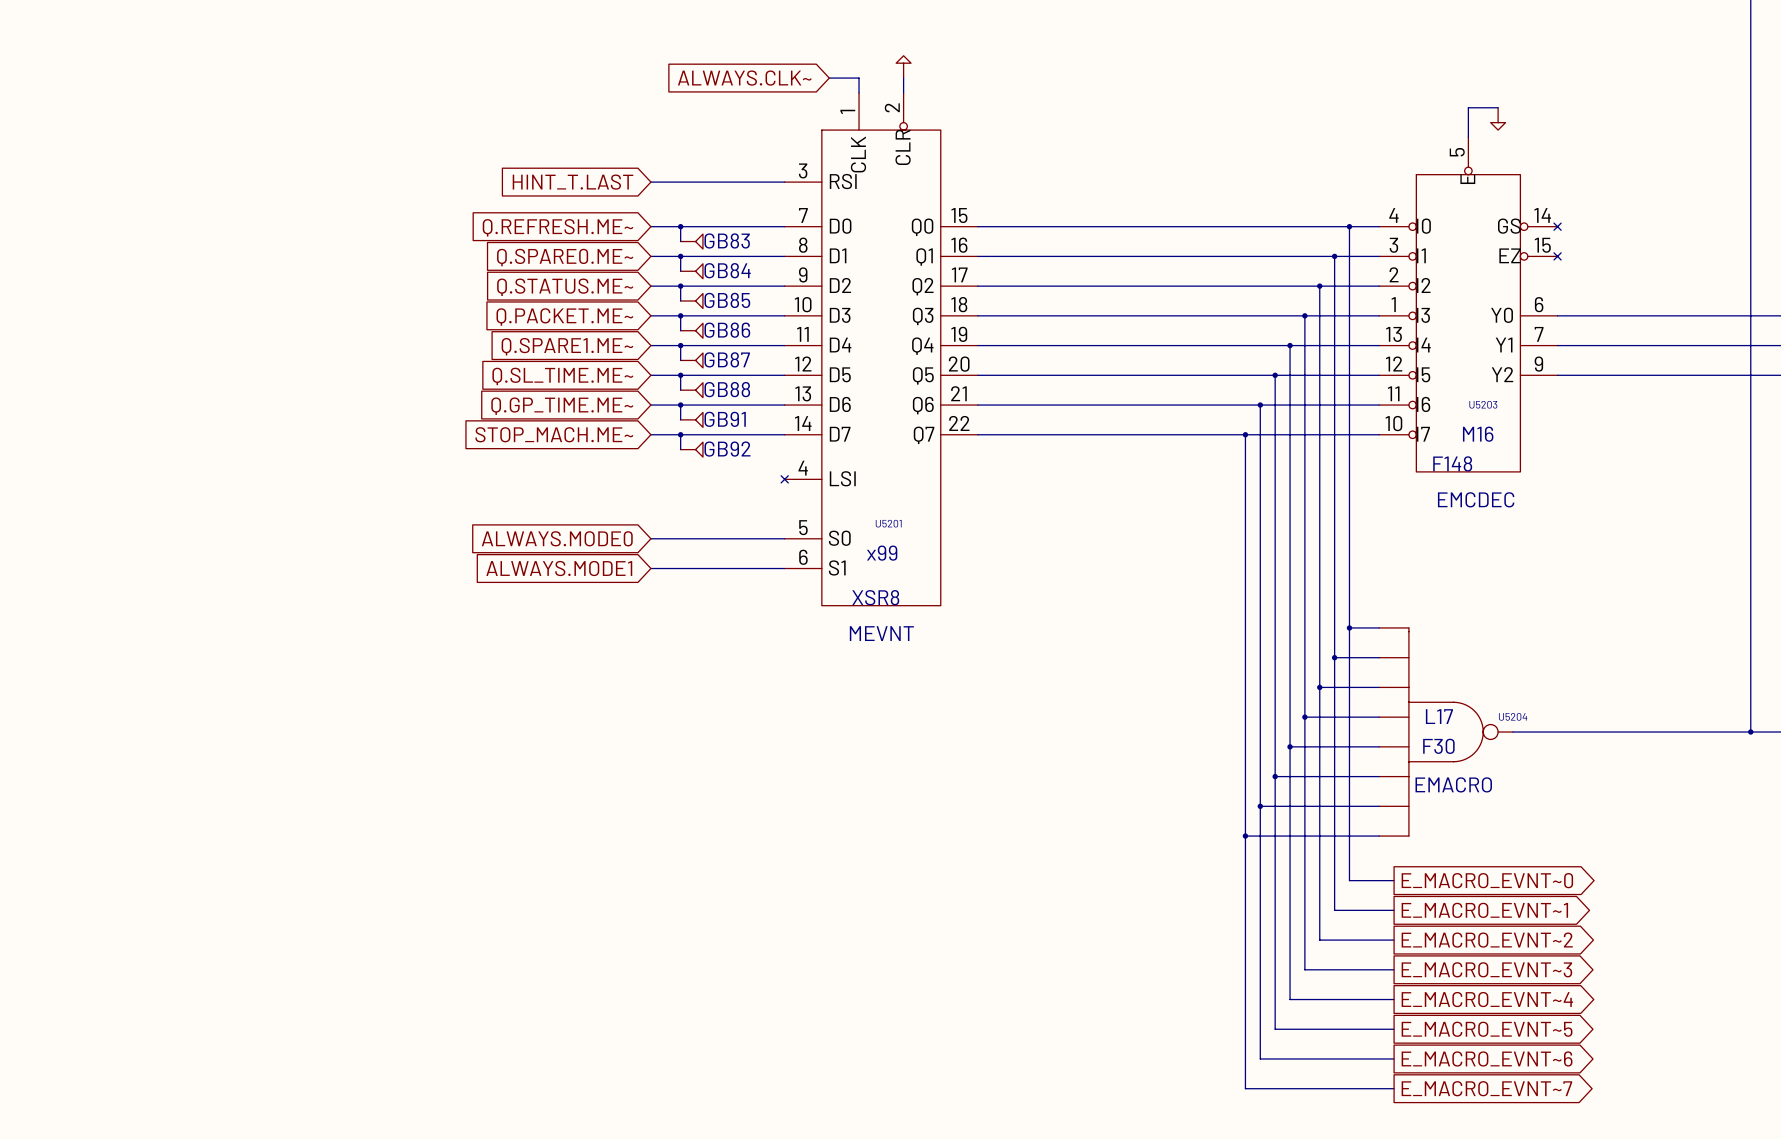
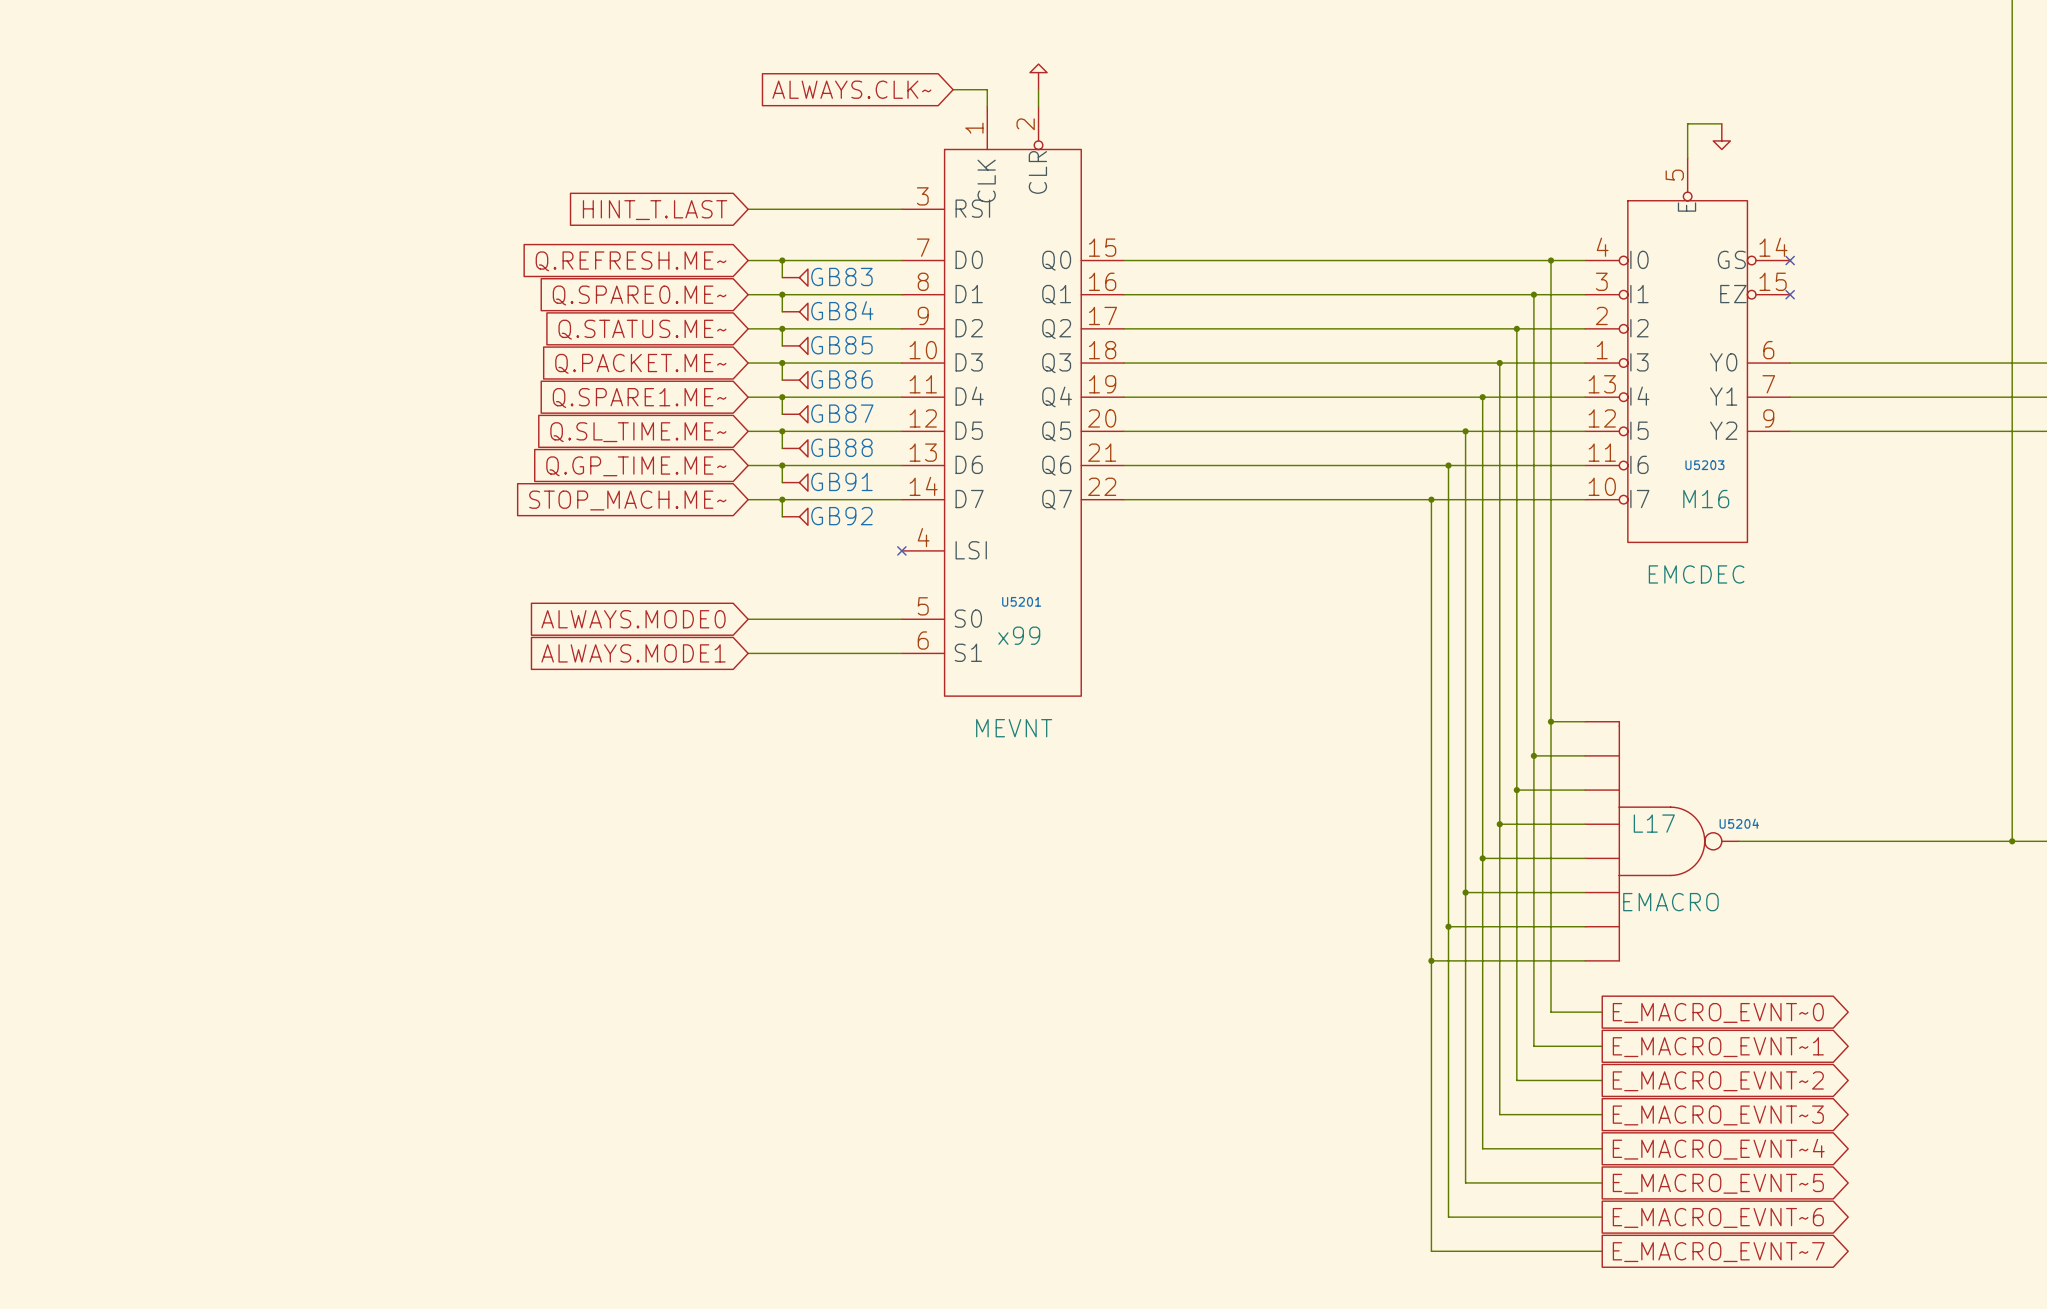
U5203 value: F148 (1452, 463) -> none
U5201 value: XSR8 (875, 597) -> none
U5204 value: F30 (1438, 746) -> none

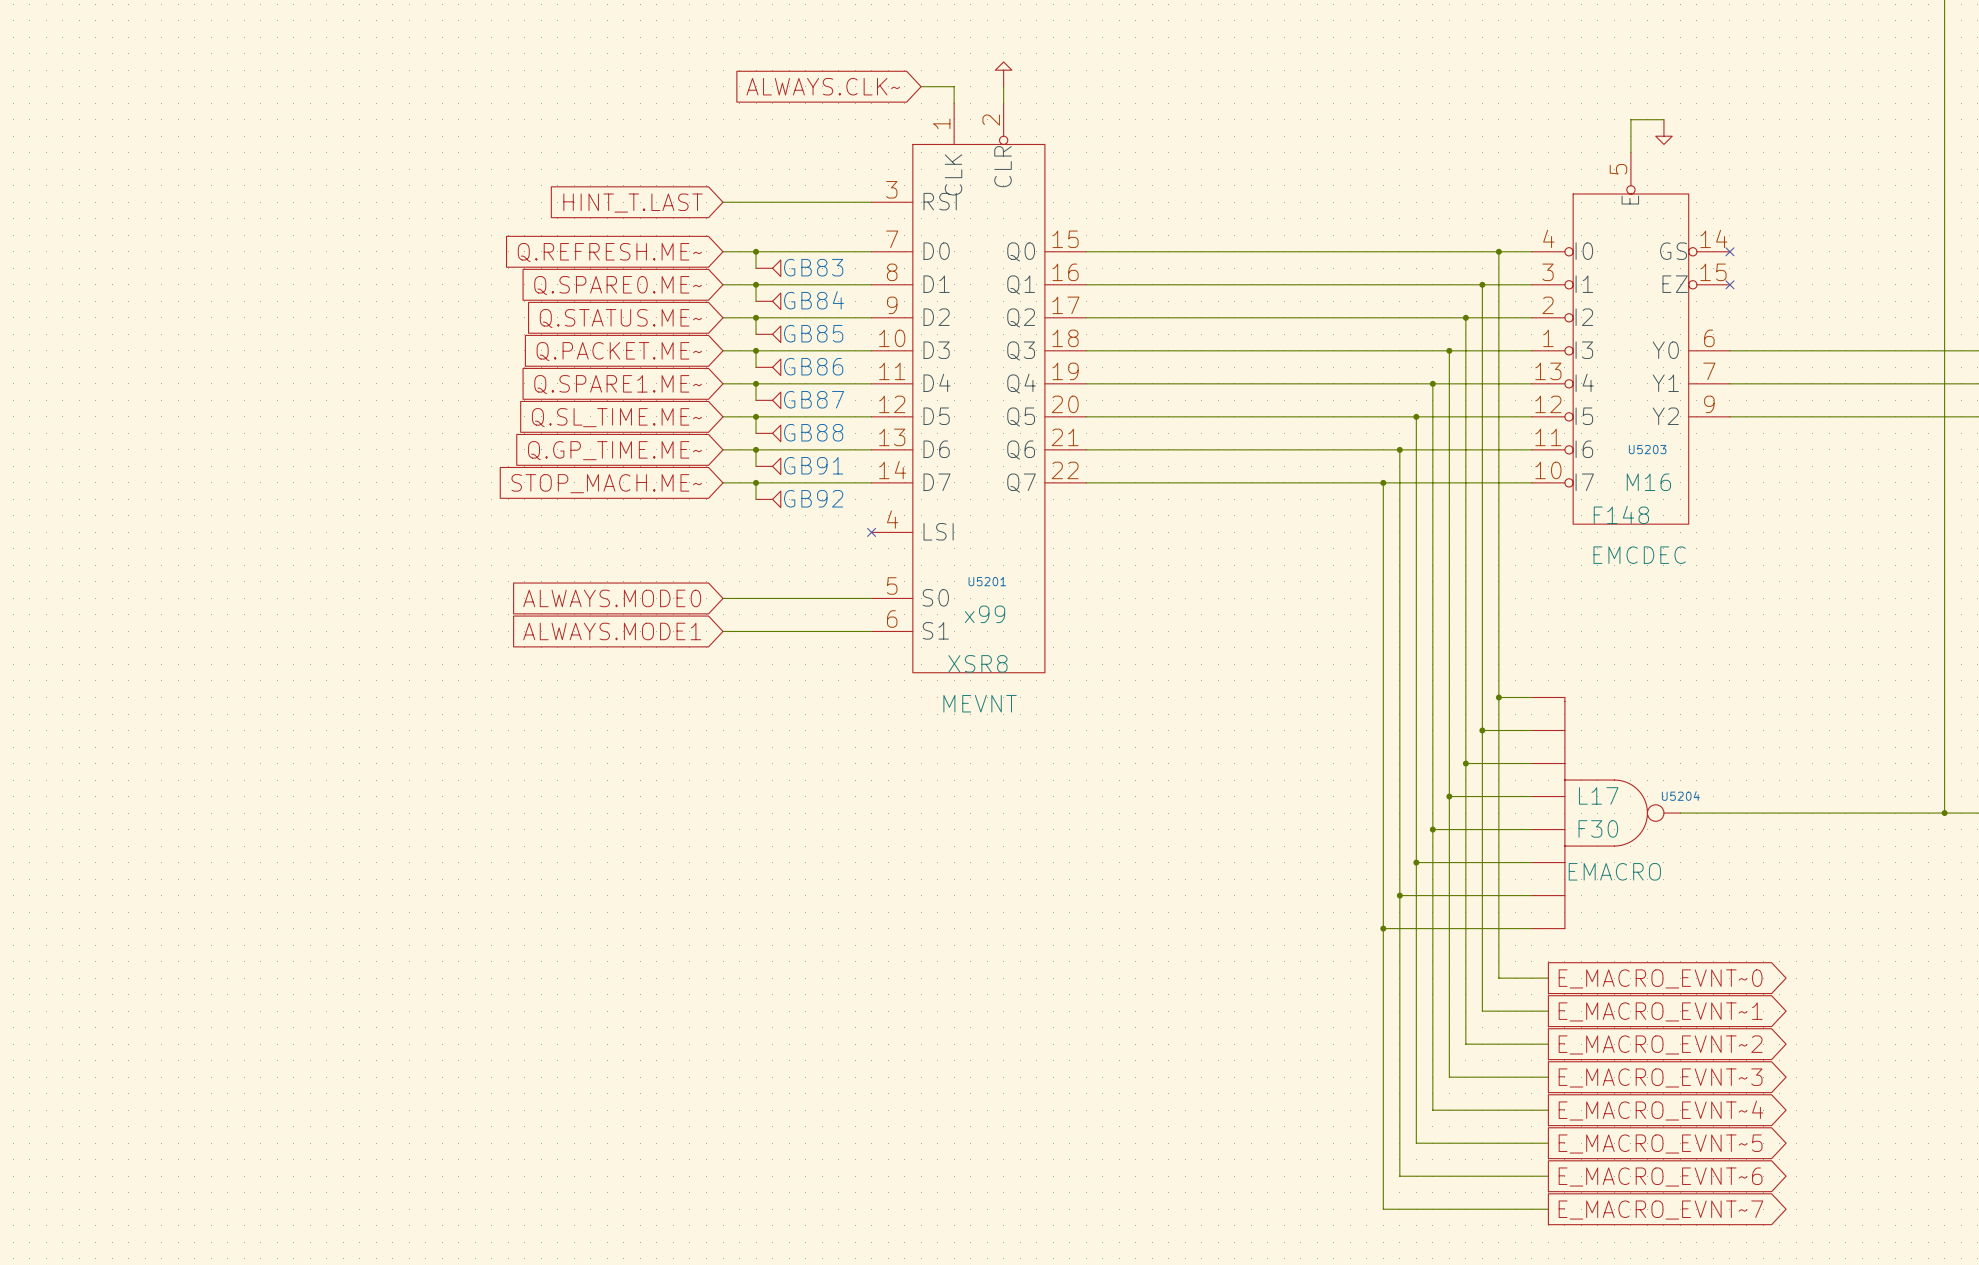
U5203 value: none -> F148 (1621, 514)
U5201 value: none -> XSR8 (977, 663)
U5204 value: none -> F30 (1598, 828)

